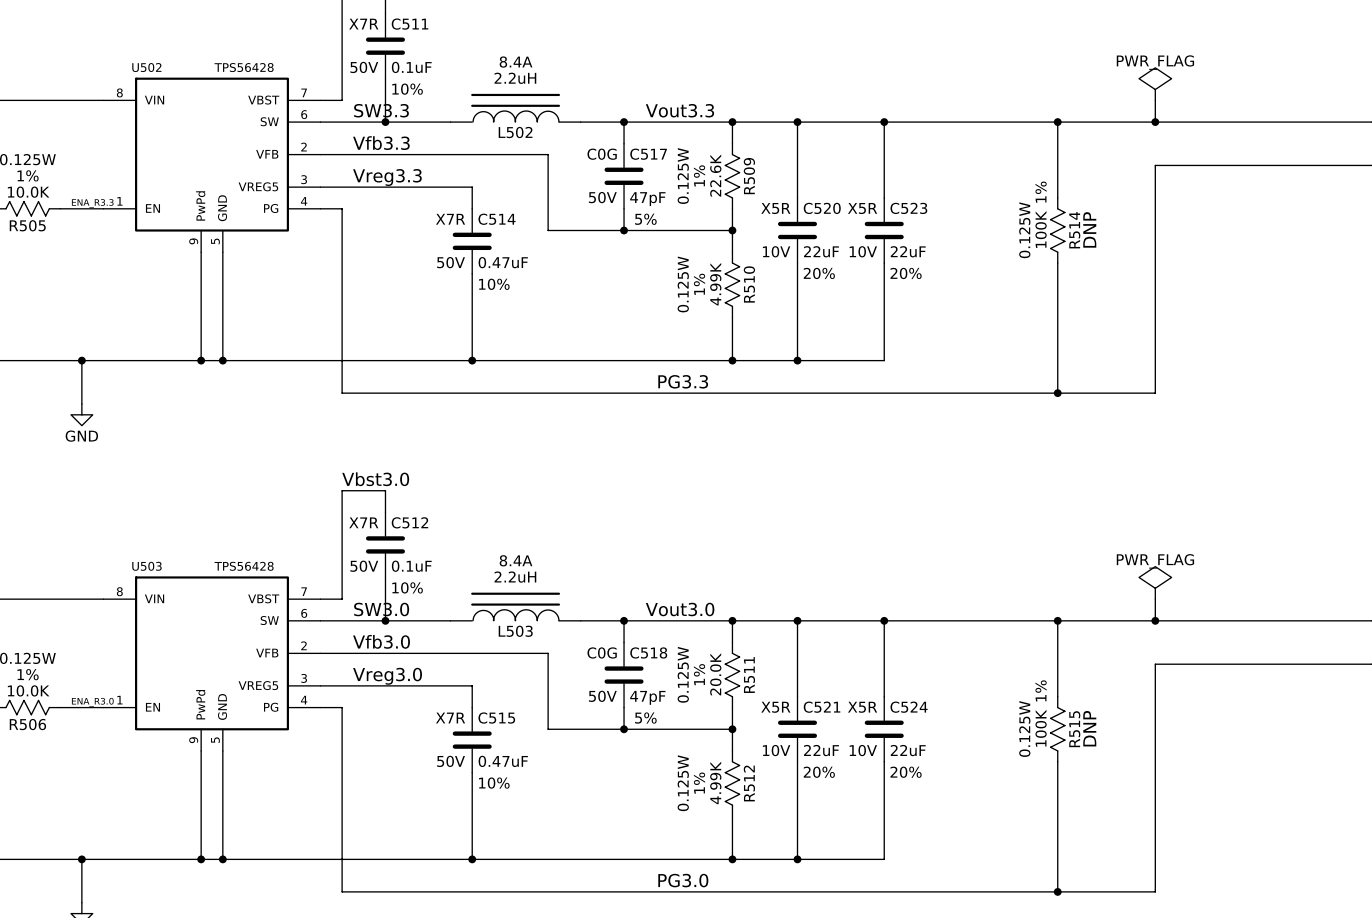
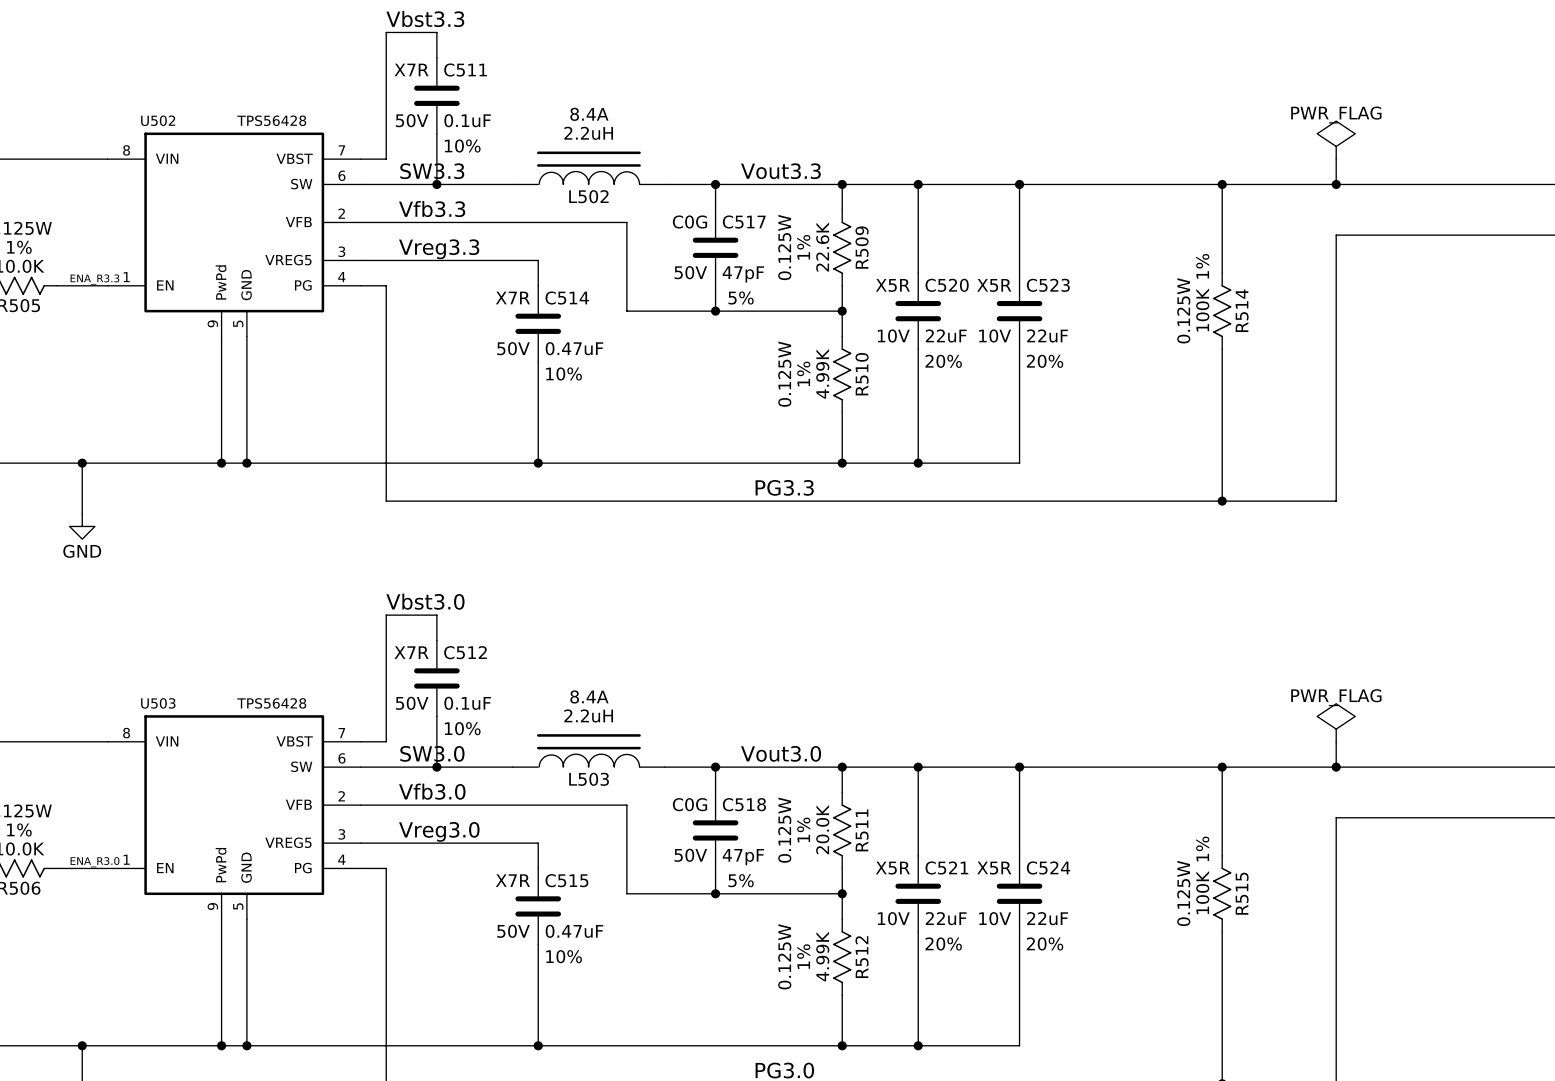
R514 text: DNP (1089, 229) -> none
R515 text: DNP (1089, 728) -> none

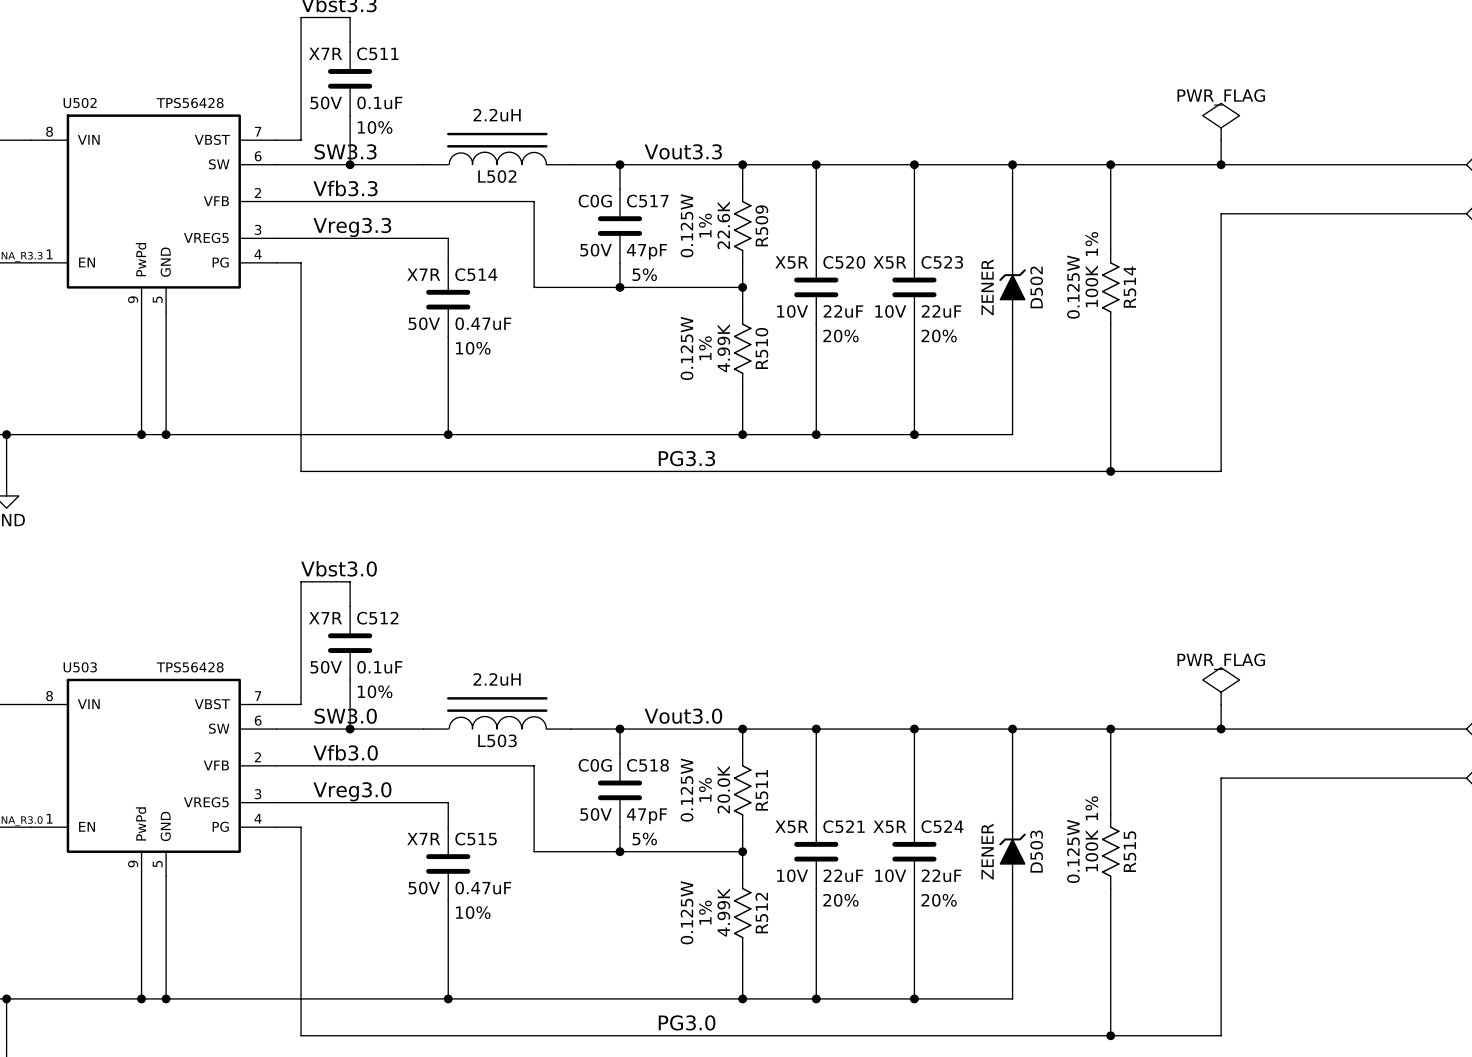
L502 text: 8.4A (589, 114) -> none
wire: none -> (1012, 164) (1012, 238)
junction: none -> (1012, 164)
D502: none -> ZENER (1012, 287)
wire: none -> (1012, 336) (1012, 434) (914, 434)
junction: none -> (914, 434)
L503 text: 8.4A (589, 696) -> none
wire: none -> (1012, 729) (1012, 802)
junction: none -> (1012, 729)
D503: none -> ZENER (1012, 851)
wire: none -> (1012, 900) (1012, 998) (914, 998)
junction: none -> (914, 998)

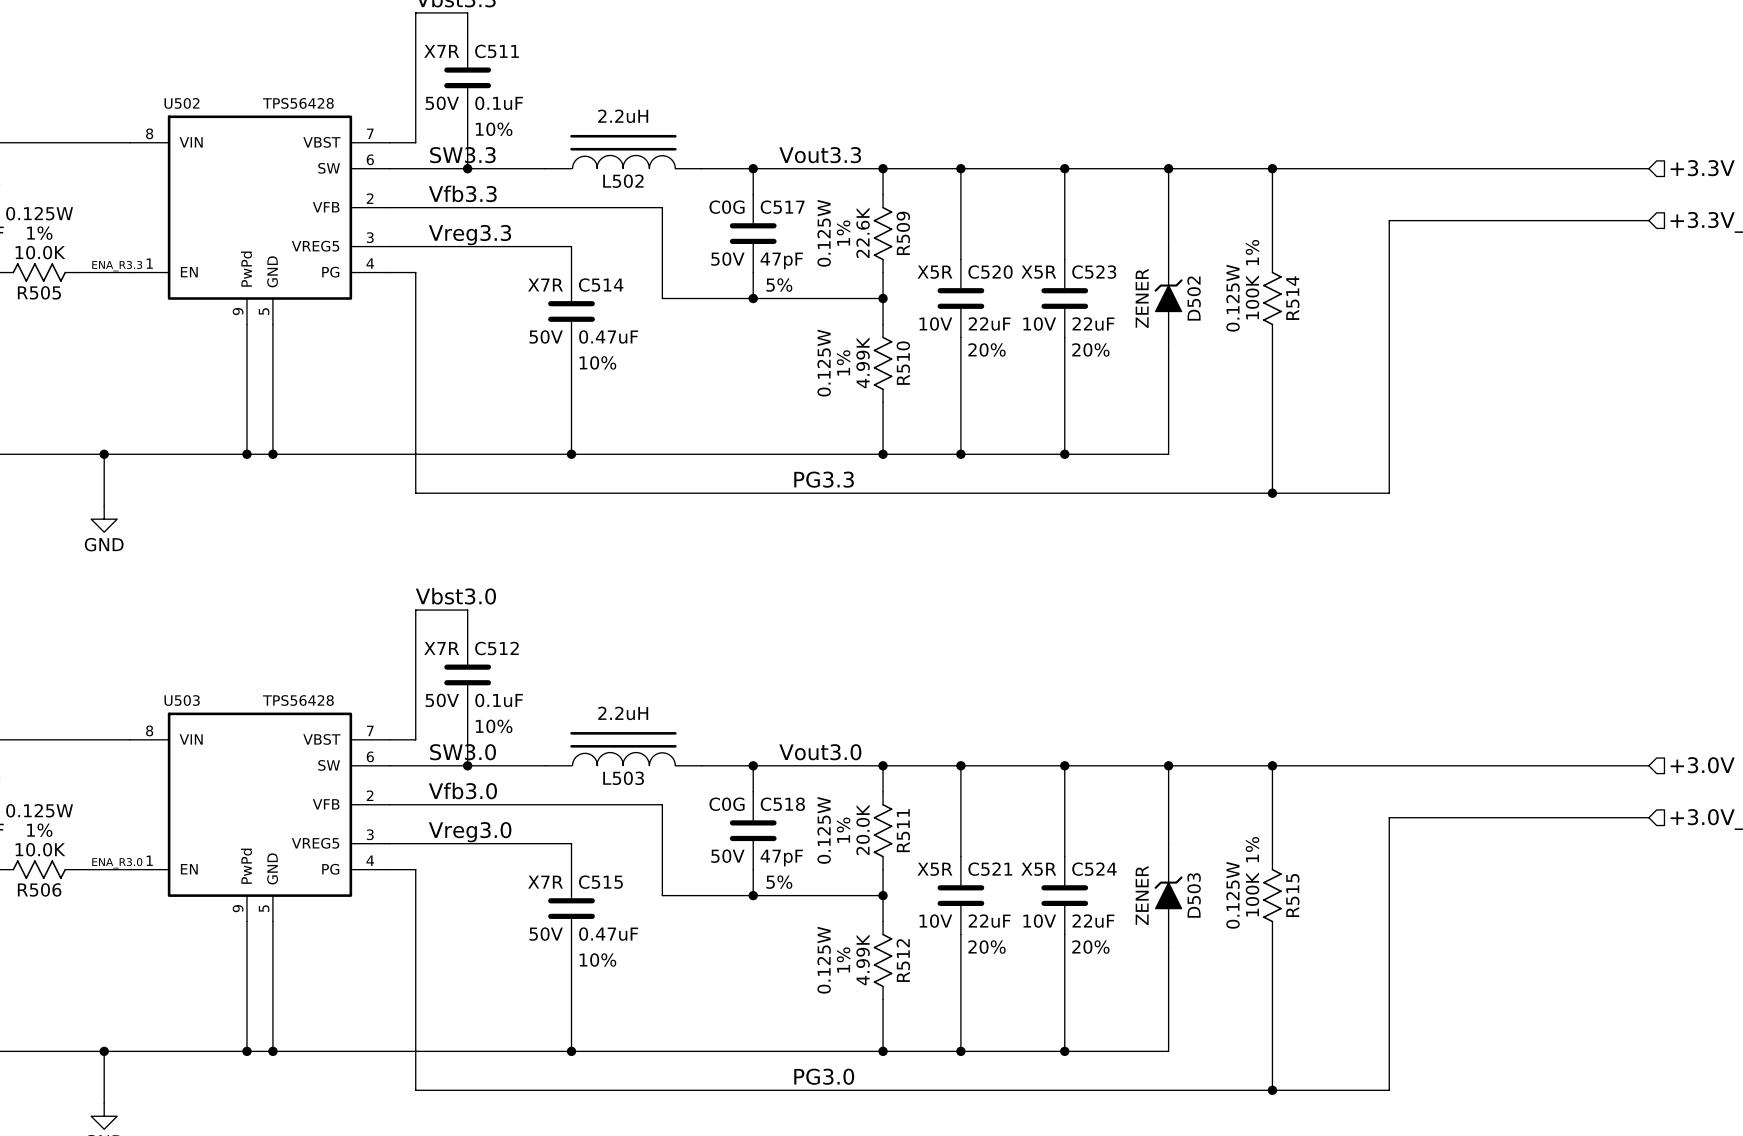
power symbol: PWR_FLAG (1221, 121) -> none
wire: (1221, 140) (1221, 164) -> none
junction: (1221, 164) -> none
power symbol: PWR_FLAG (1221, 686) -> none
wire: (1221, 704) (1221, 729) -> none
junction: (1221, 729) -> none

